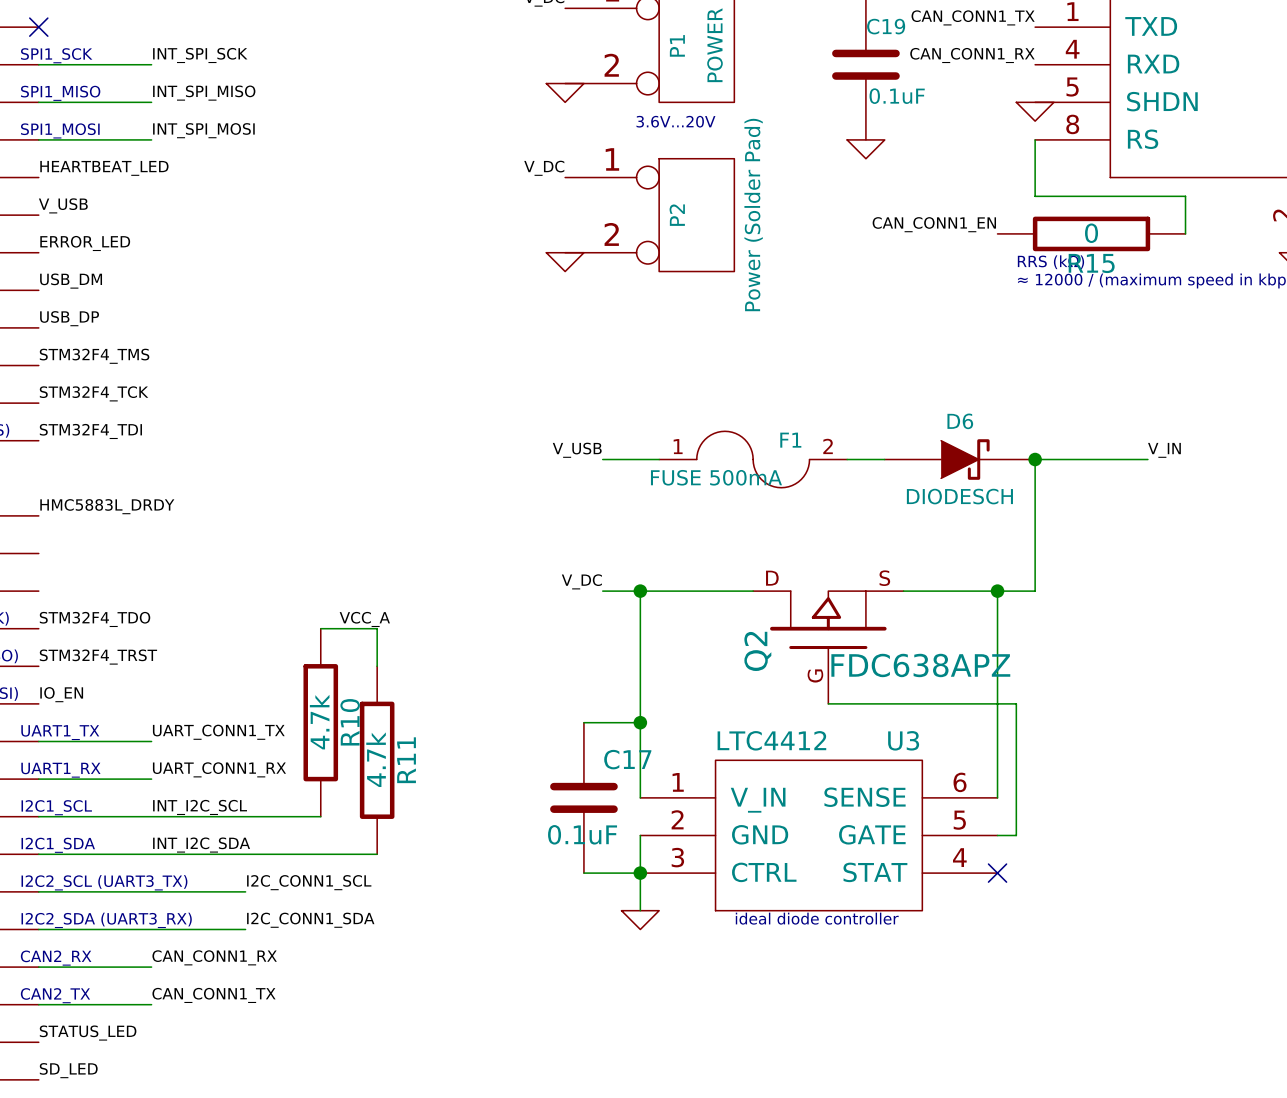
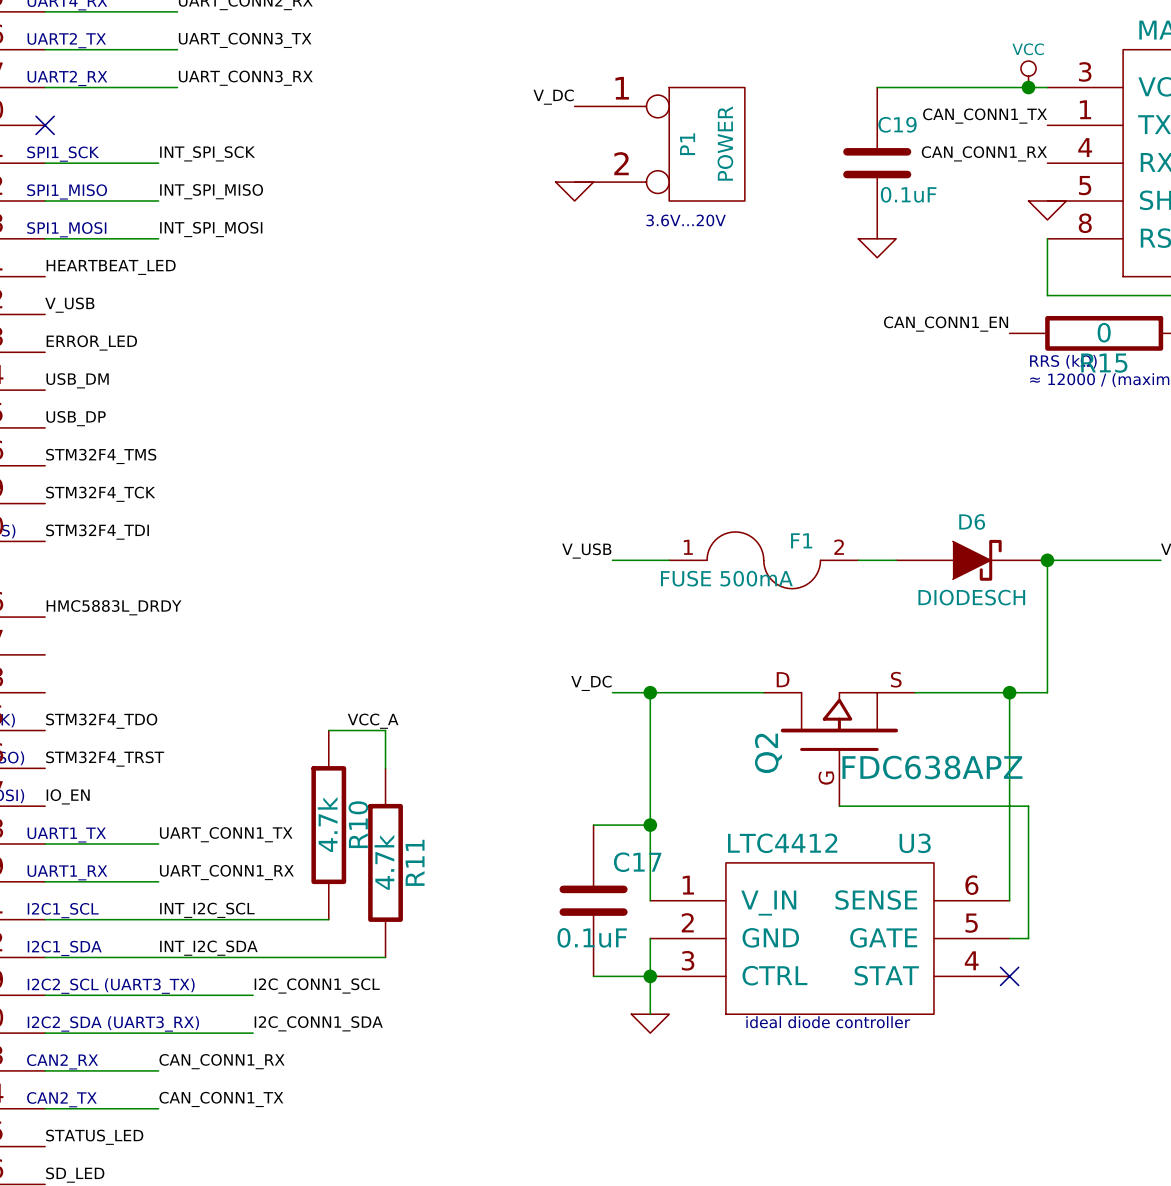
label: V_DC (544, 168) -> none
P2: Power (Solder Pad) (649, 215) -> none
power symbol: (565, 262) -> none

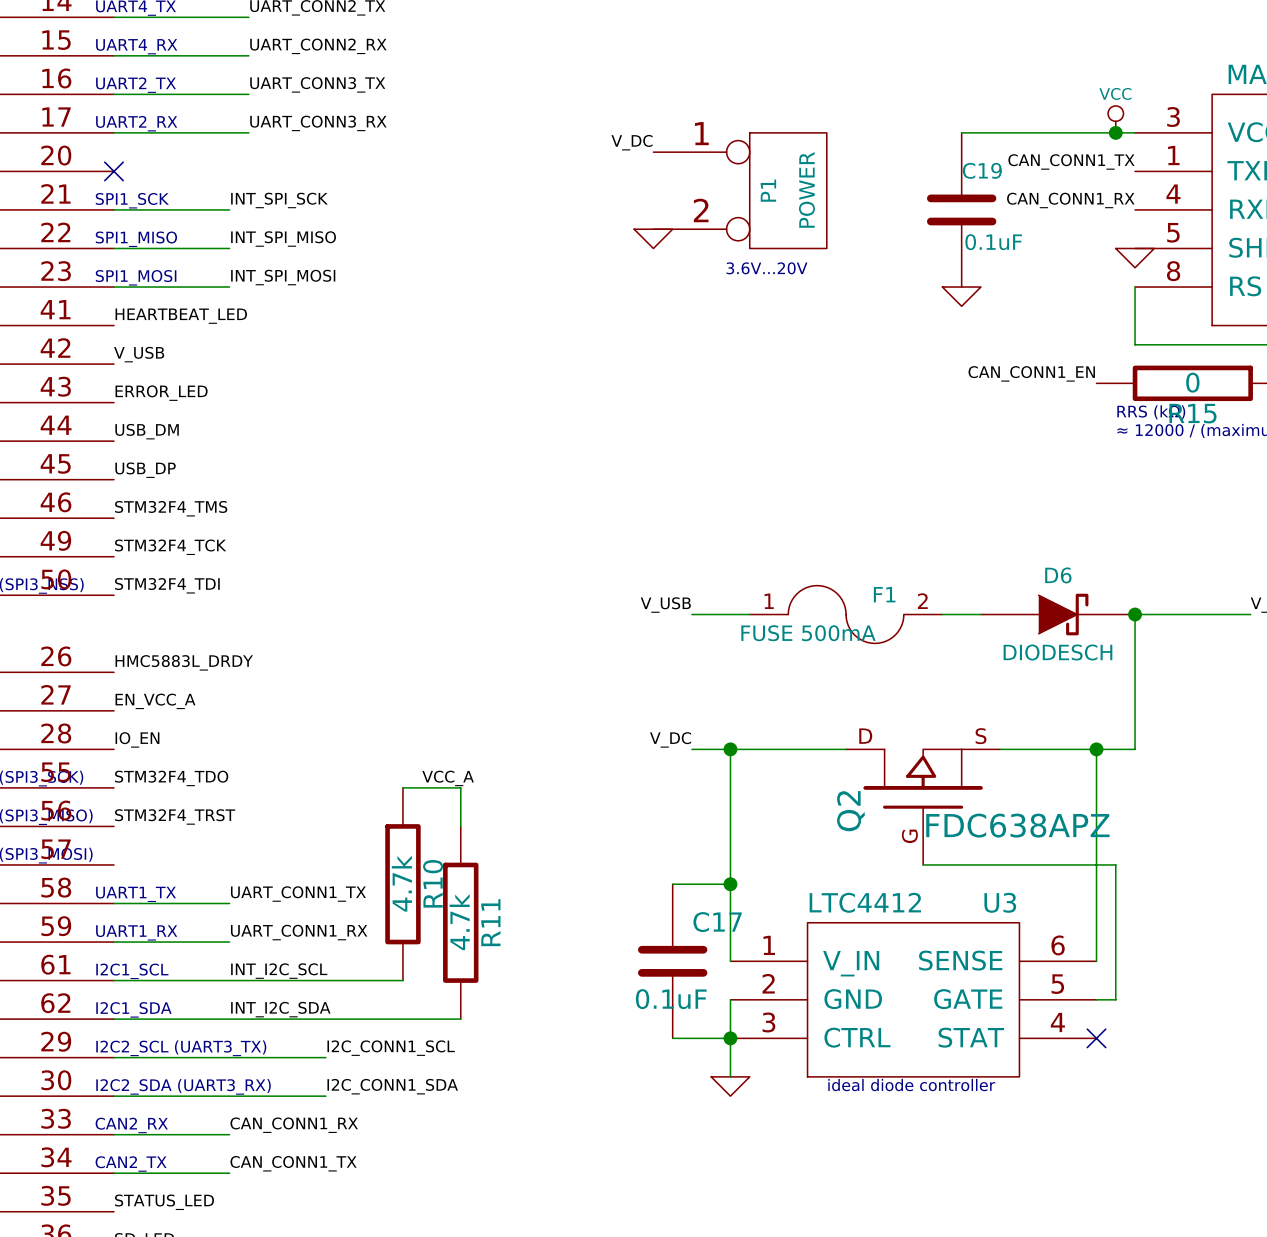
label: none -> EN_VCC_A (155, 701)
label position: IO_EN (68, 796) -> IO_EN (137, 739)

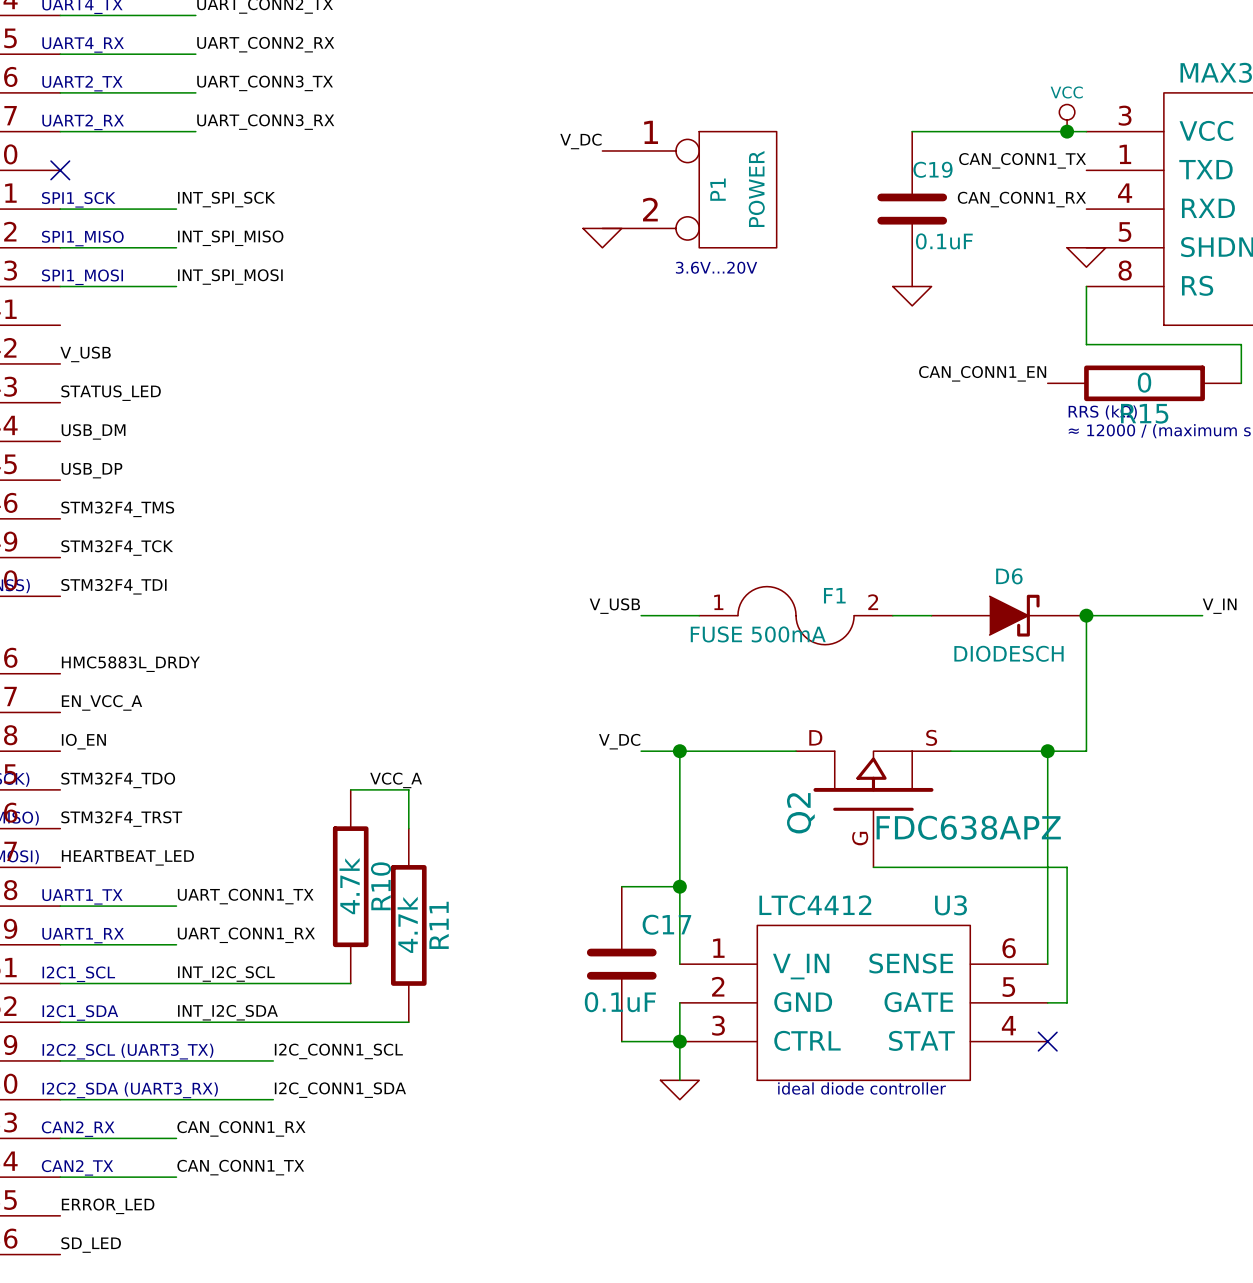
label: HEARTBEAT_LED (181, 316) -> none
label: ERROR_LED (161, 393) -> STATUS_LED (111, 393)
label: none -> HEARTBEAT_LED (127, 857)
label: STATUS_LED (164, 1202) -> ERROR_LED (108, 1206)

